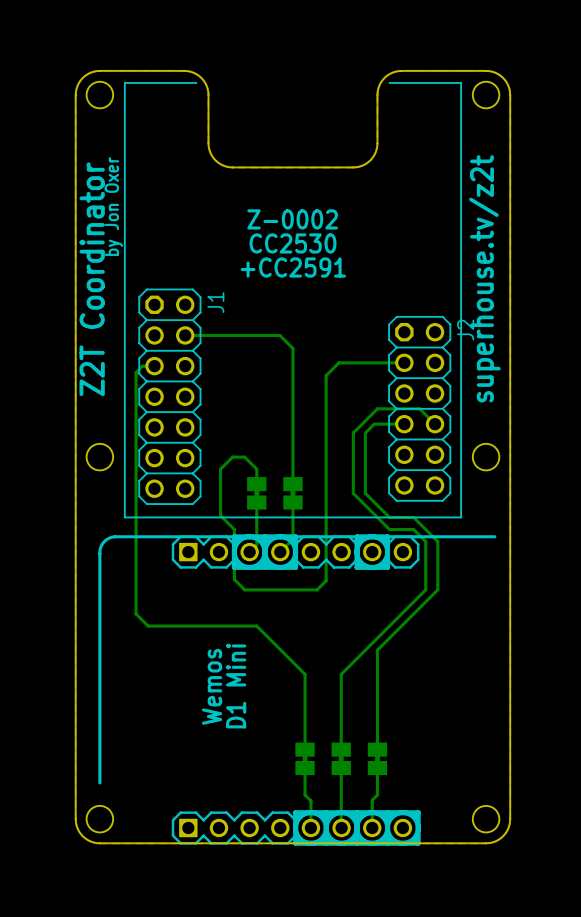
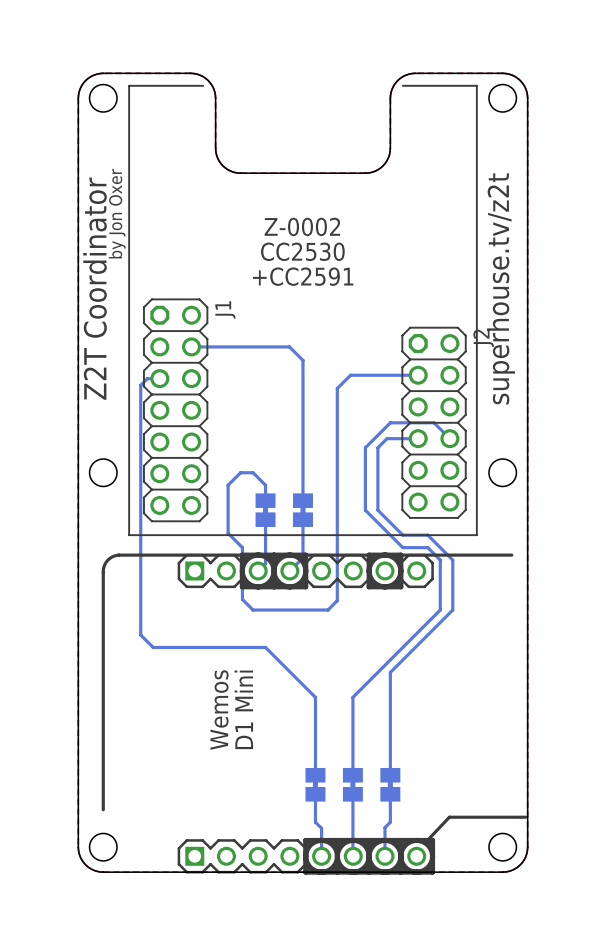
line: none -> (525, 817) (449, 817) (425, 842)

